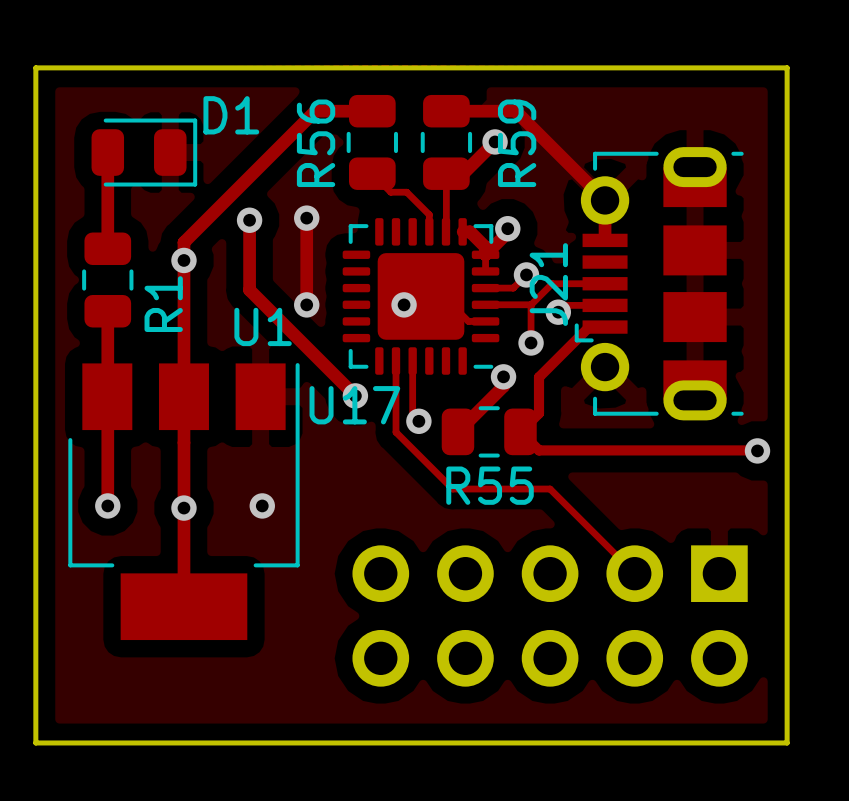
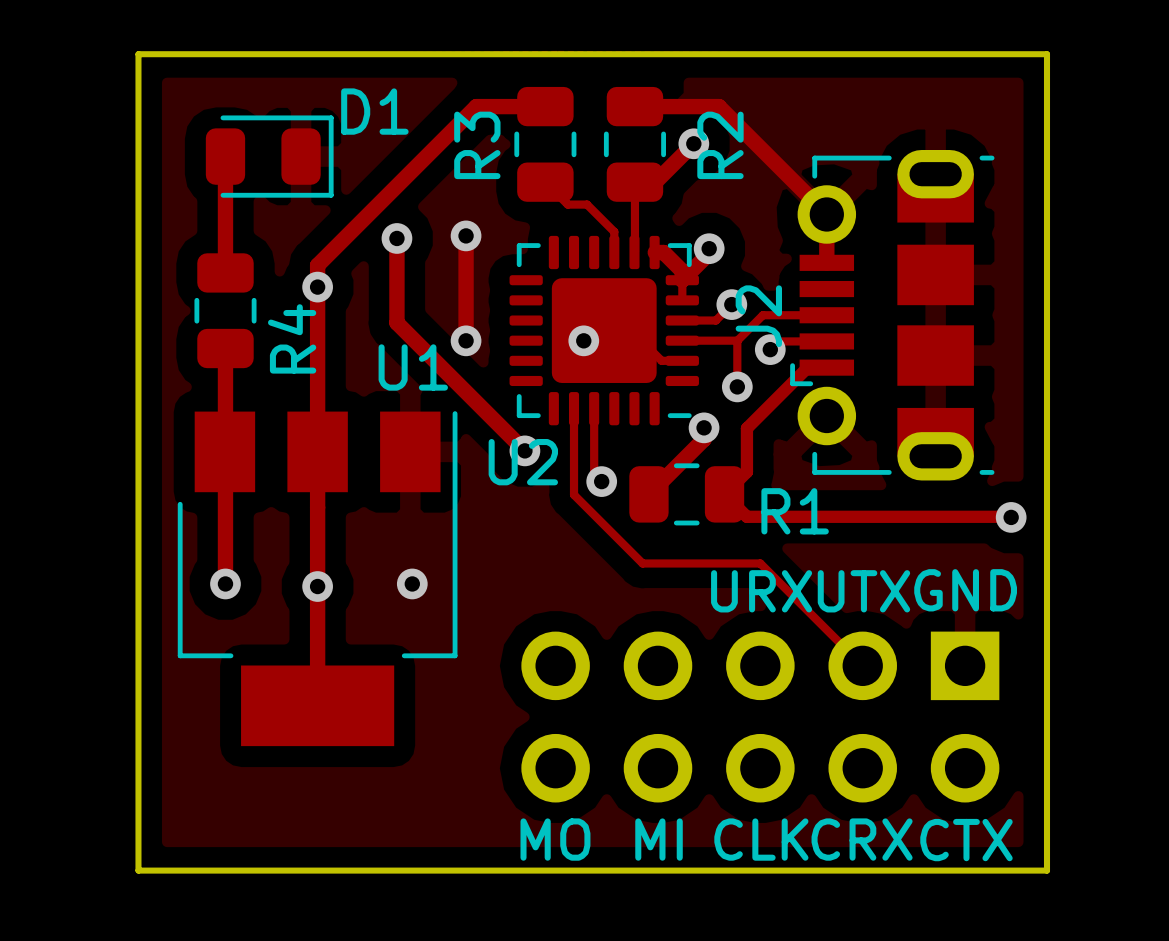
R56 name: R56 (316, 143) -> R3 (477, 145)
R59 name: R59 (517, 143) -> R2 (720, 145)
J21 name: J21 (548, 284) -> J2 (758, 316)
R1 name: R1 (163, 304) -> R4 (292, 338)
U17 name: U17 (354, 405) -> U2 (523, 462)
R55 name: R55 (490, 485) -> R1 (795, 511)
text: none -> GND (965, 590)
text: none -> URX (761, 591)
text: none -> UTX (863, 591)
text: none -> MO (555, 839)
text: none -> MI (659, 839)
text: none -> CLK (761, 839)
text: none -> CRX (862, 839)
text: none -> CTX (966, 840)

